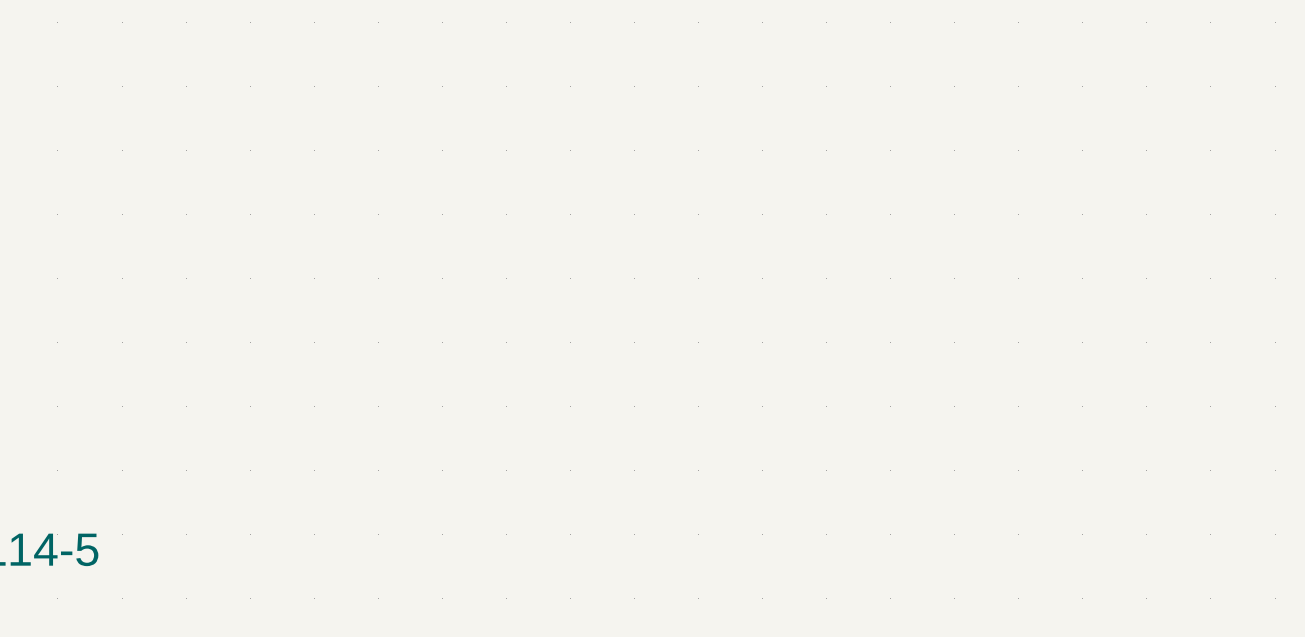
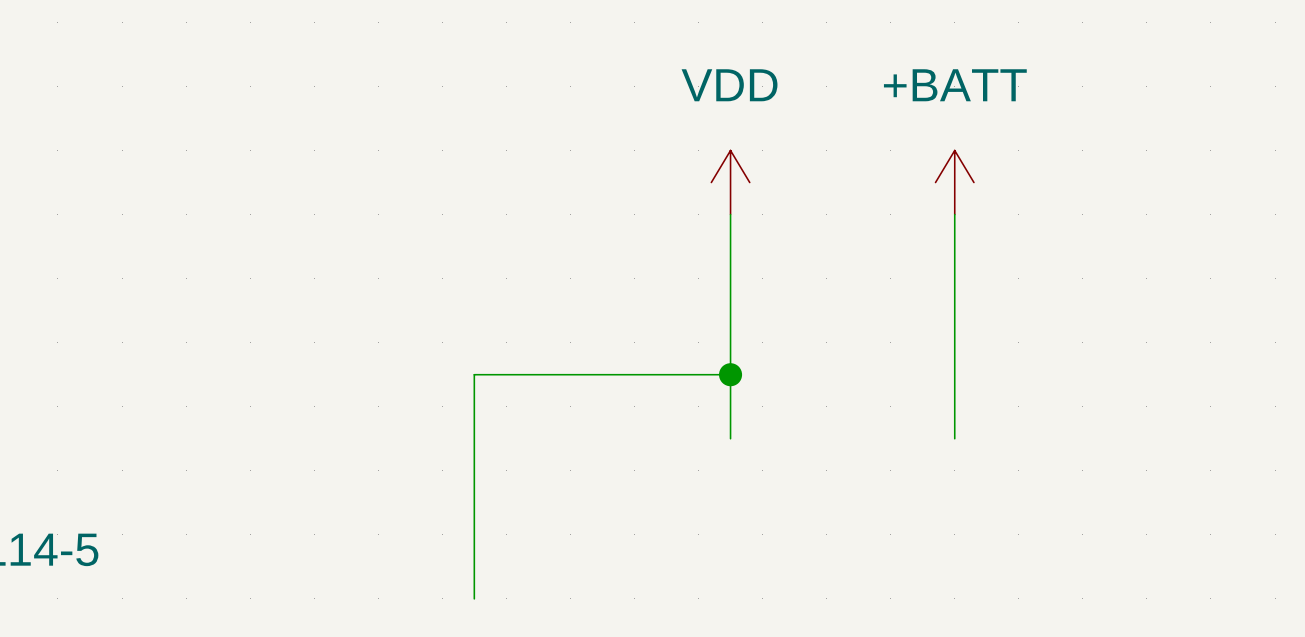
power symbol: none -> VDD (730, 182)
power symbol: none -> +BATT (954, 182)
wire: none -> (730, 214) (730, 438)
wire: none -> (954, 214) (954, 438)
wire: none -> (730, 374) (474, 374) (474, 598)
junction: none -> (730, 374)

